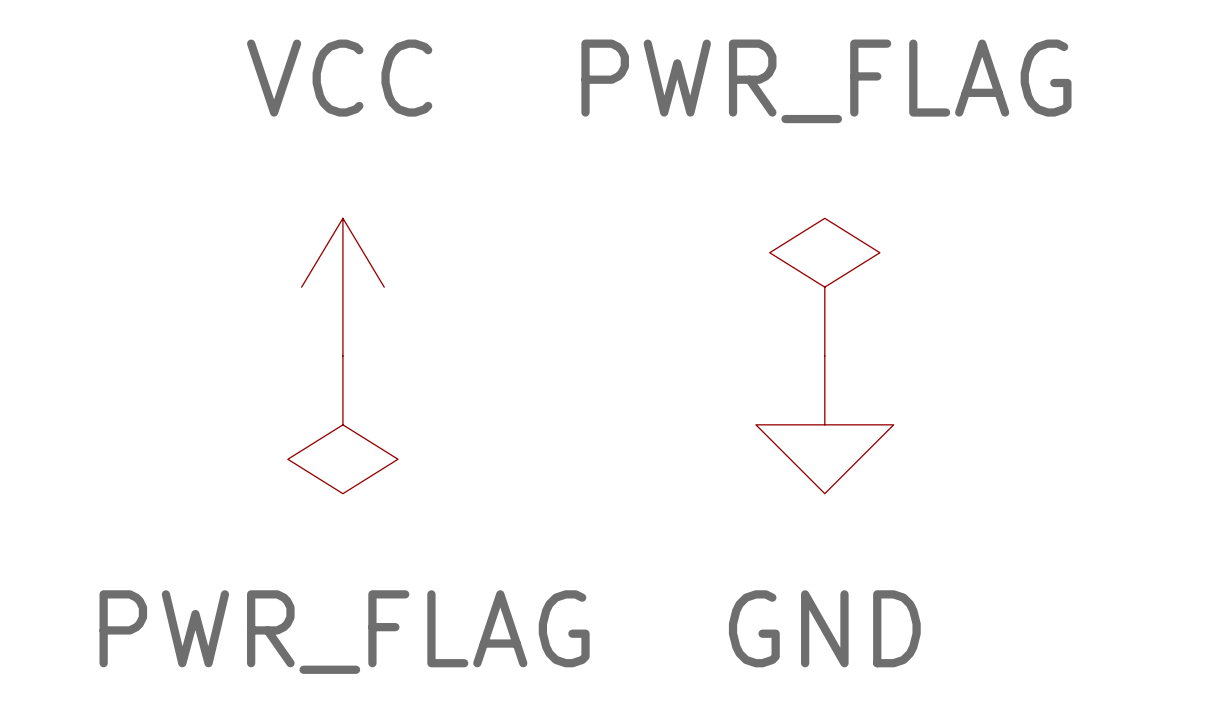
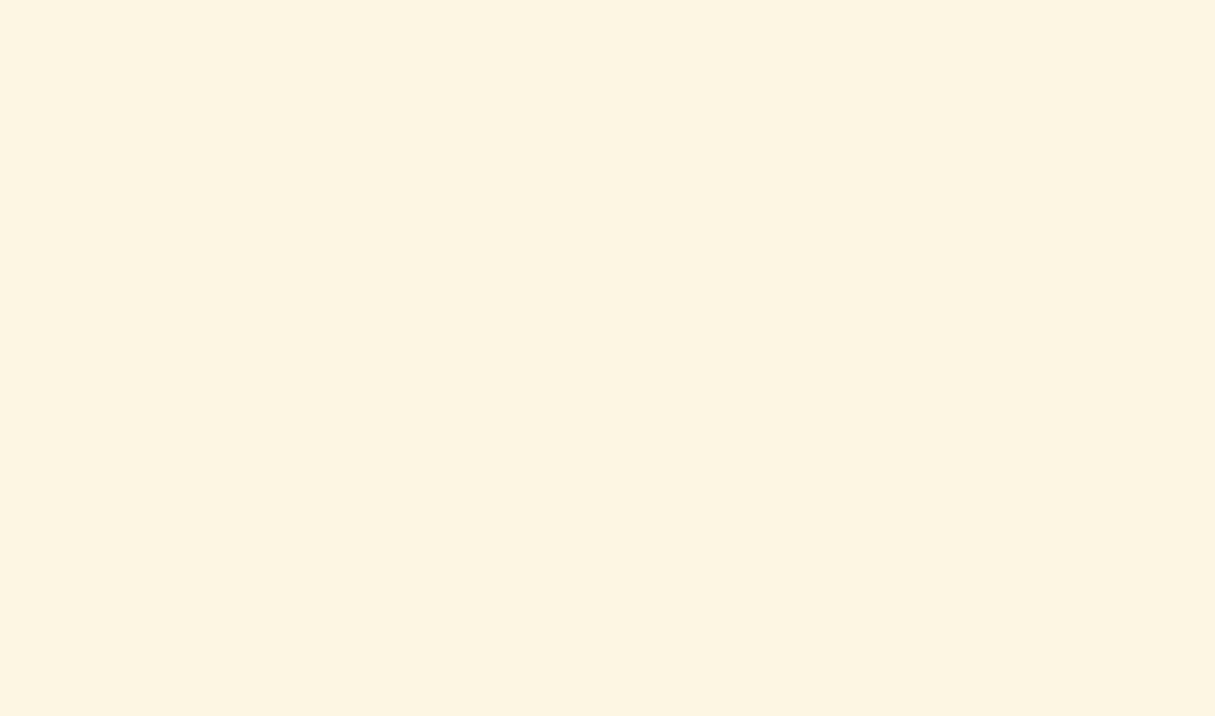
power symbol: VCC (342, 287) -> none
power symbol: PWR_FLAG (824, 287) -> none
power symbol: PWR_FLAG (342, 424) -> none
power symbol: GND (824, 424) -> none

